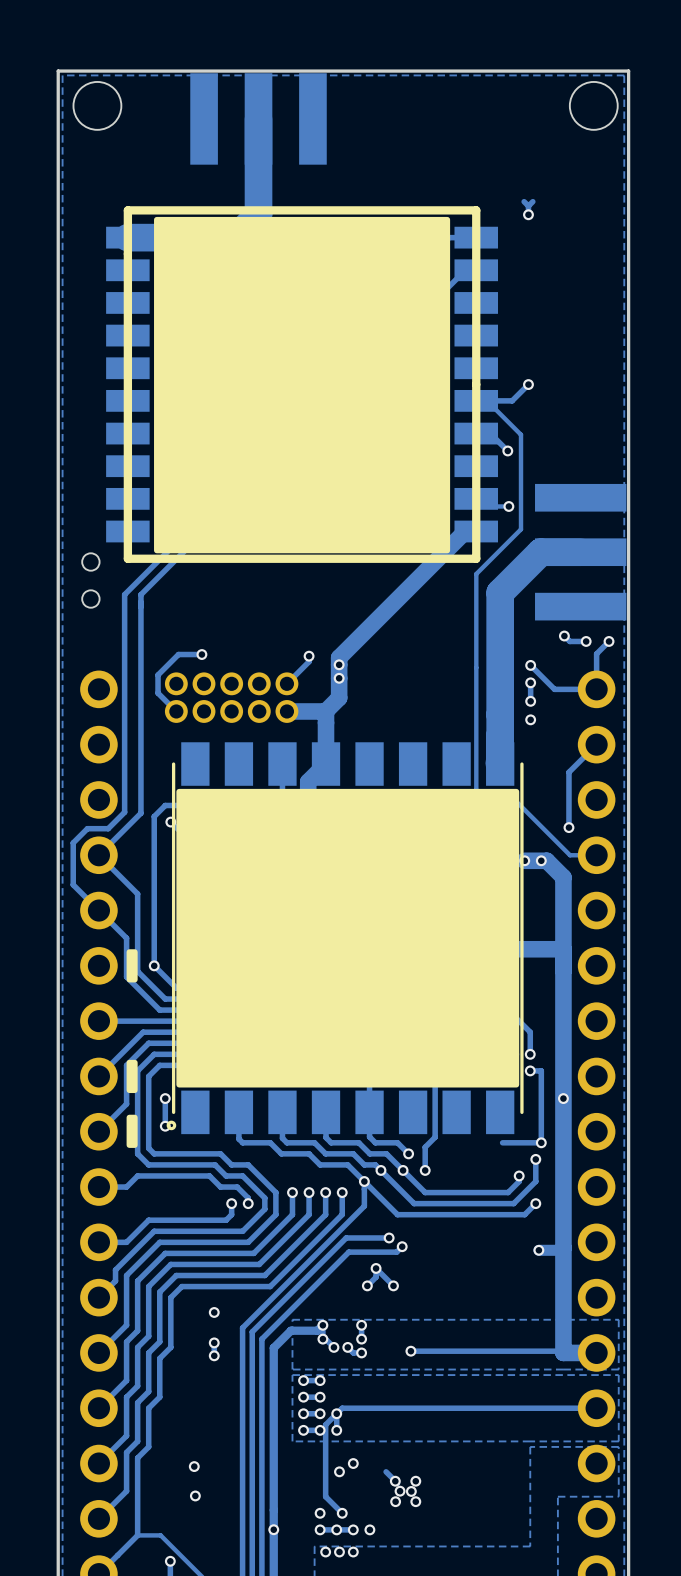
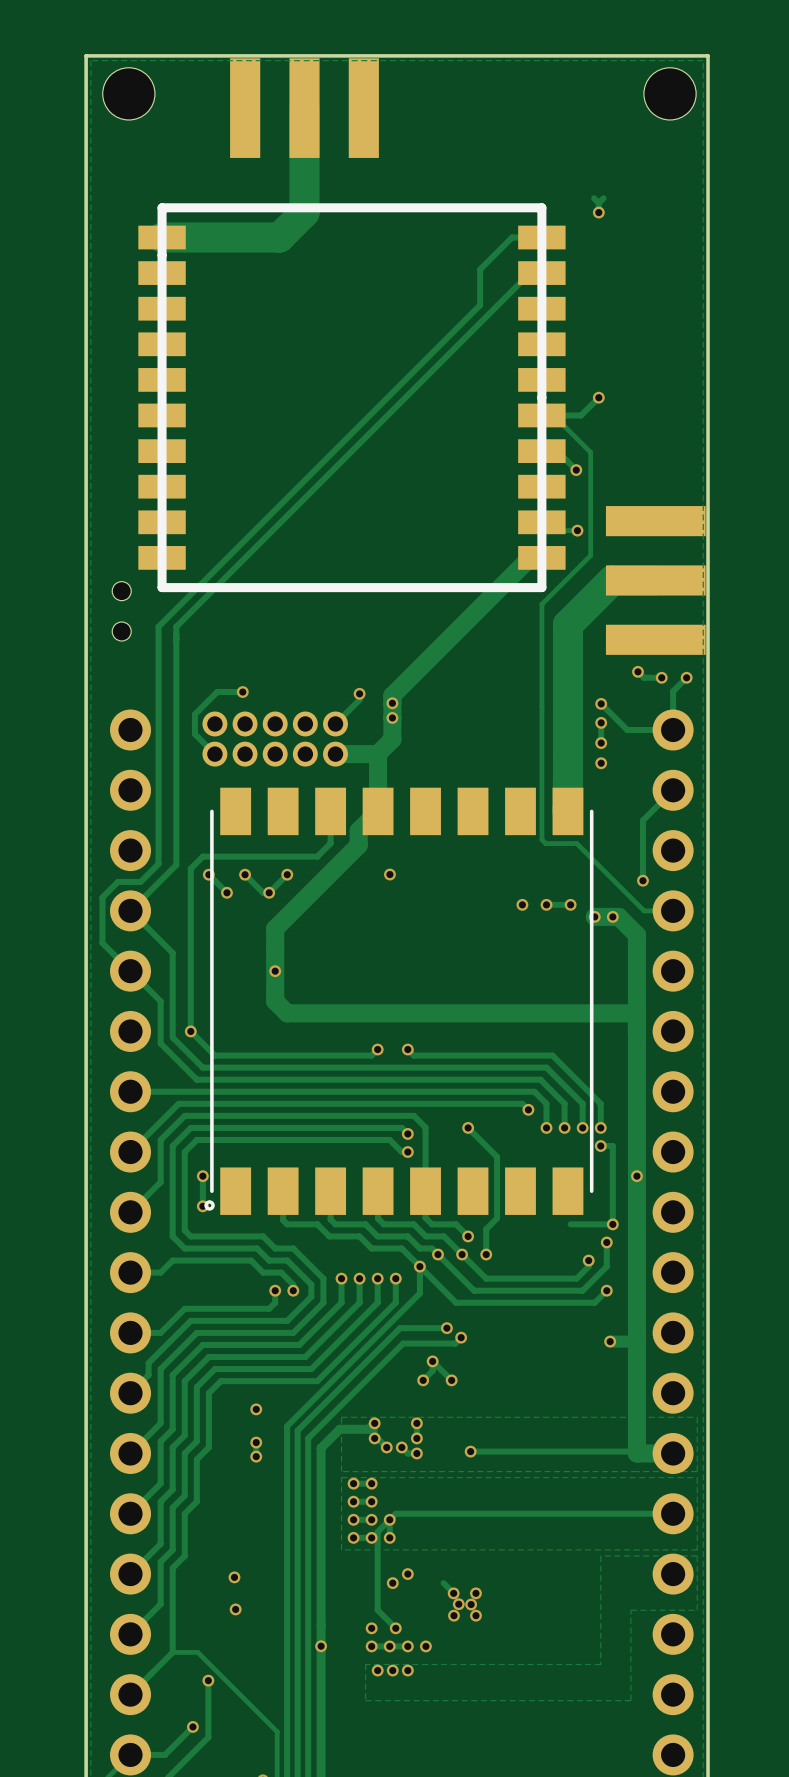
drawing: [154, 216, 451, 554] -> none
drawing: [176, 788, 520, 1088] -> none
drawing: [126, 949, 138, 983] -> none
drawing: [126, 1059, 138, 1148] -> none

